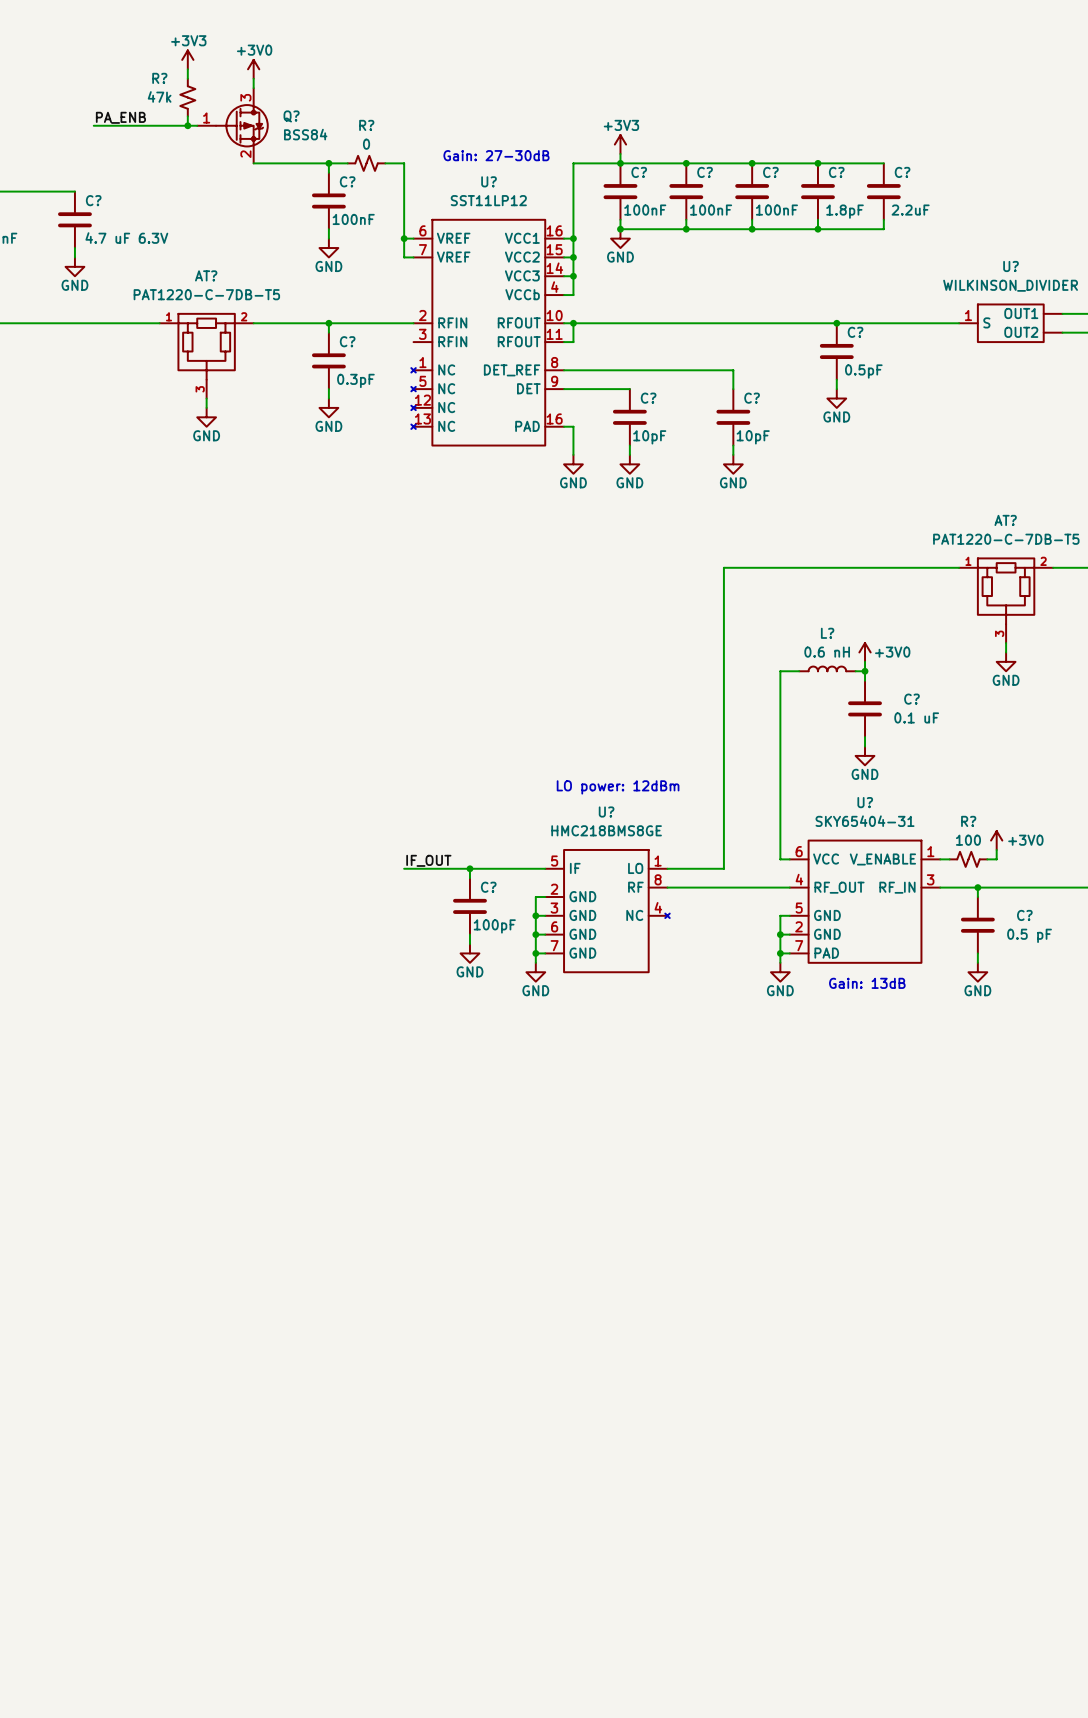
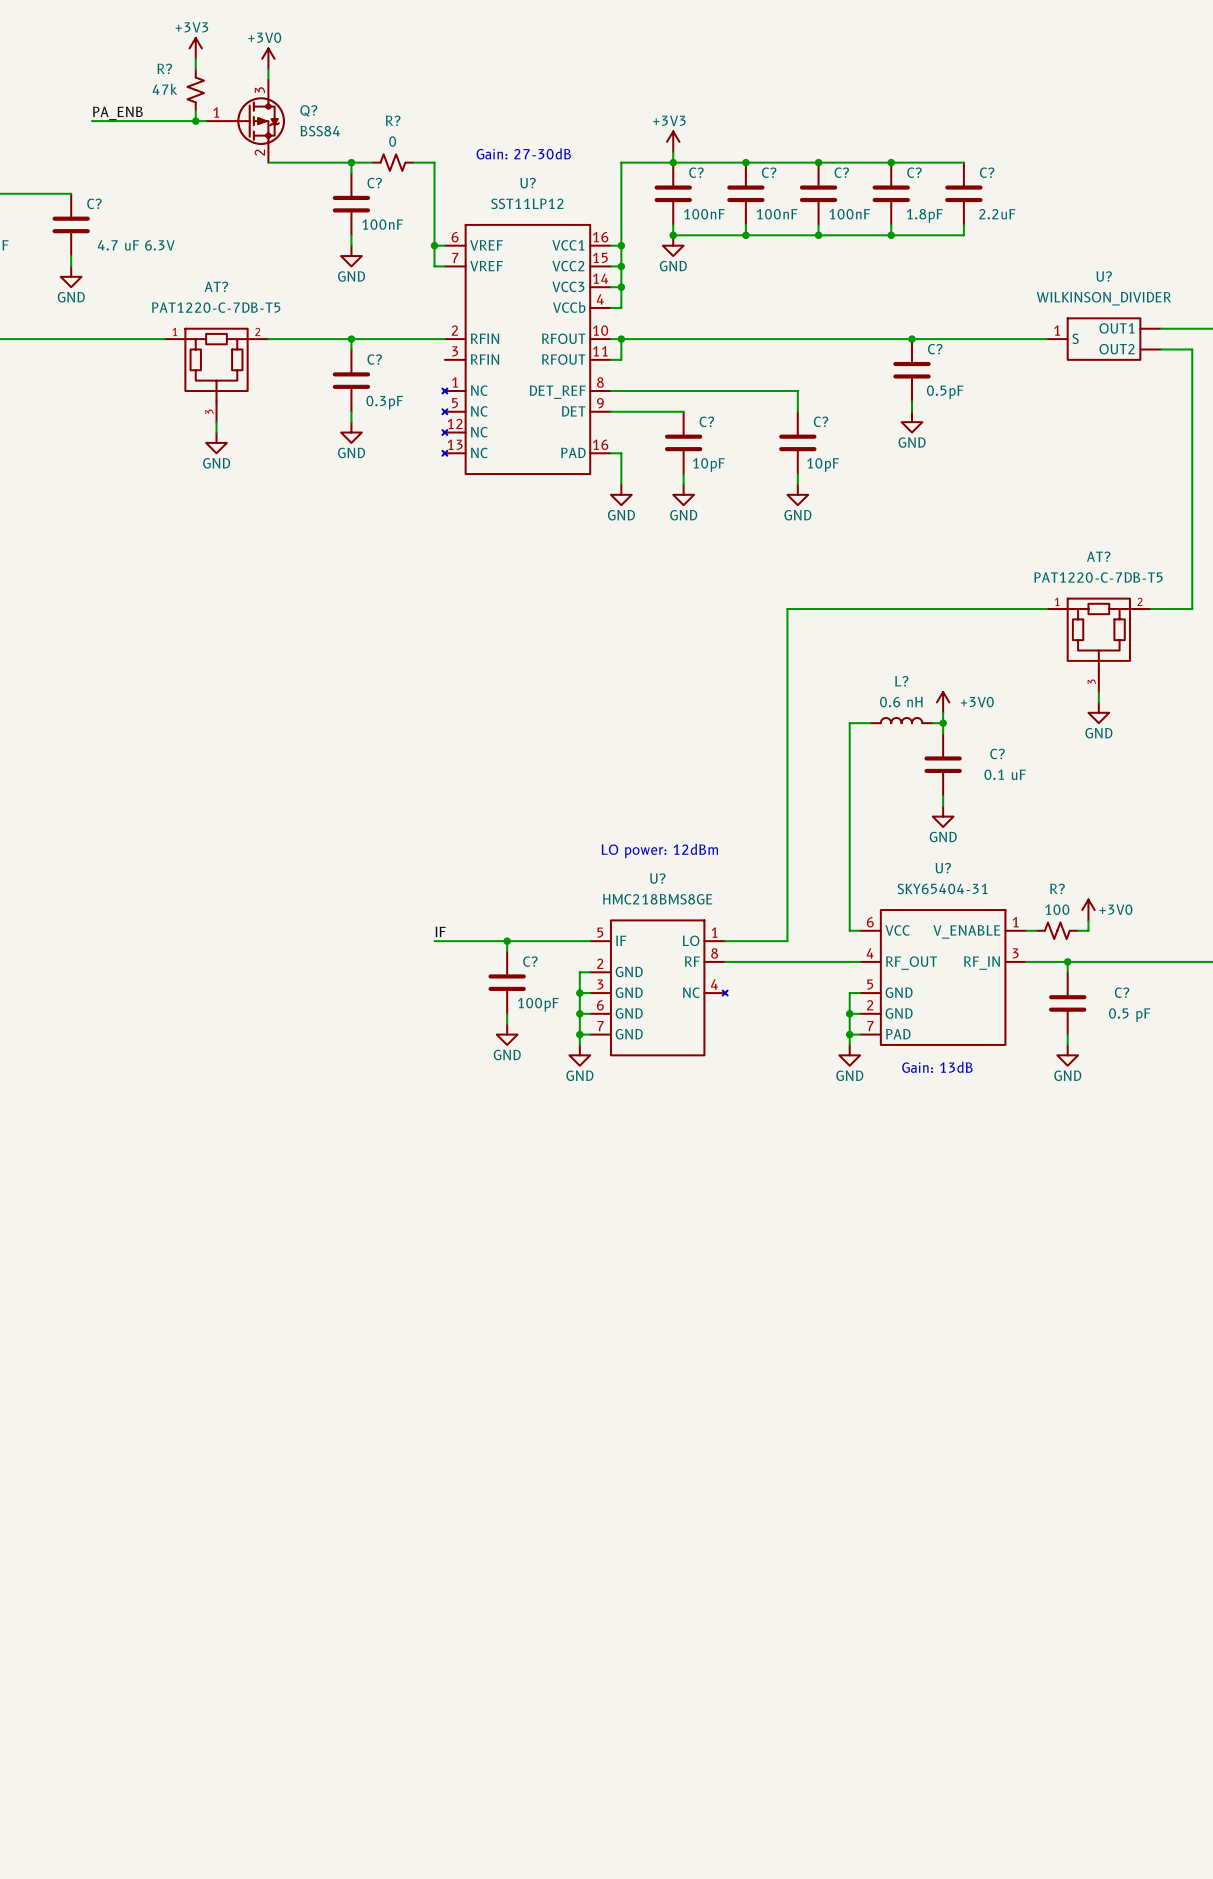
label: IF_OUT (428, 860) -> IF (440, 931)

